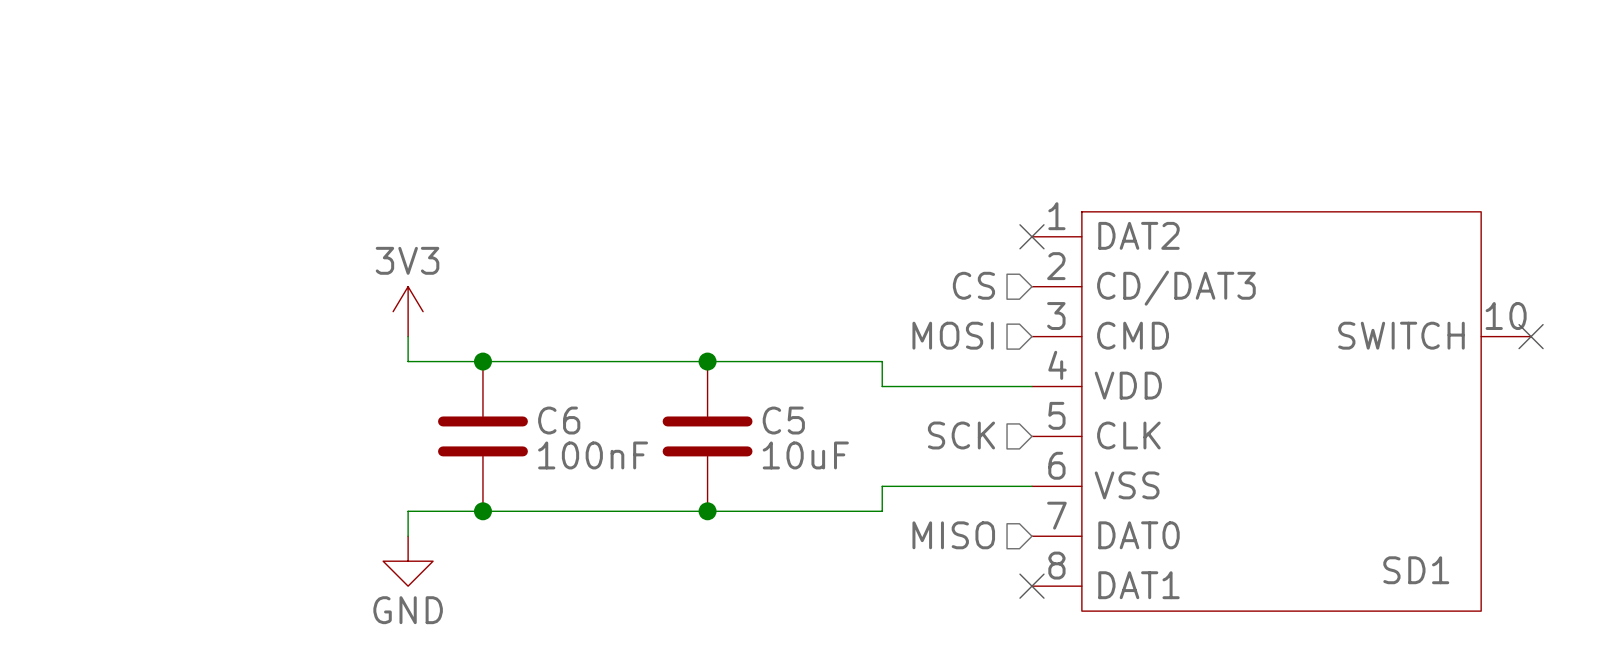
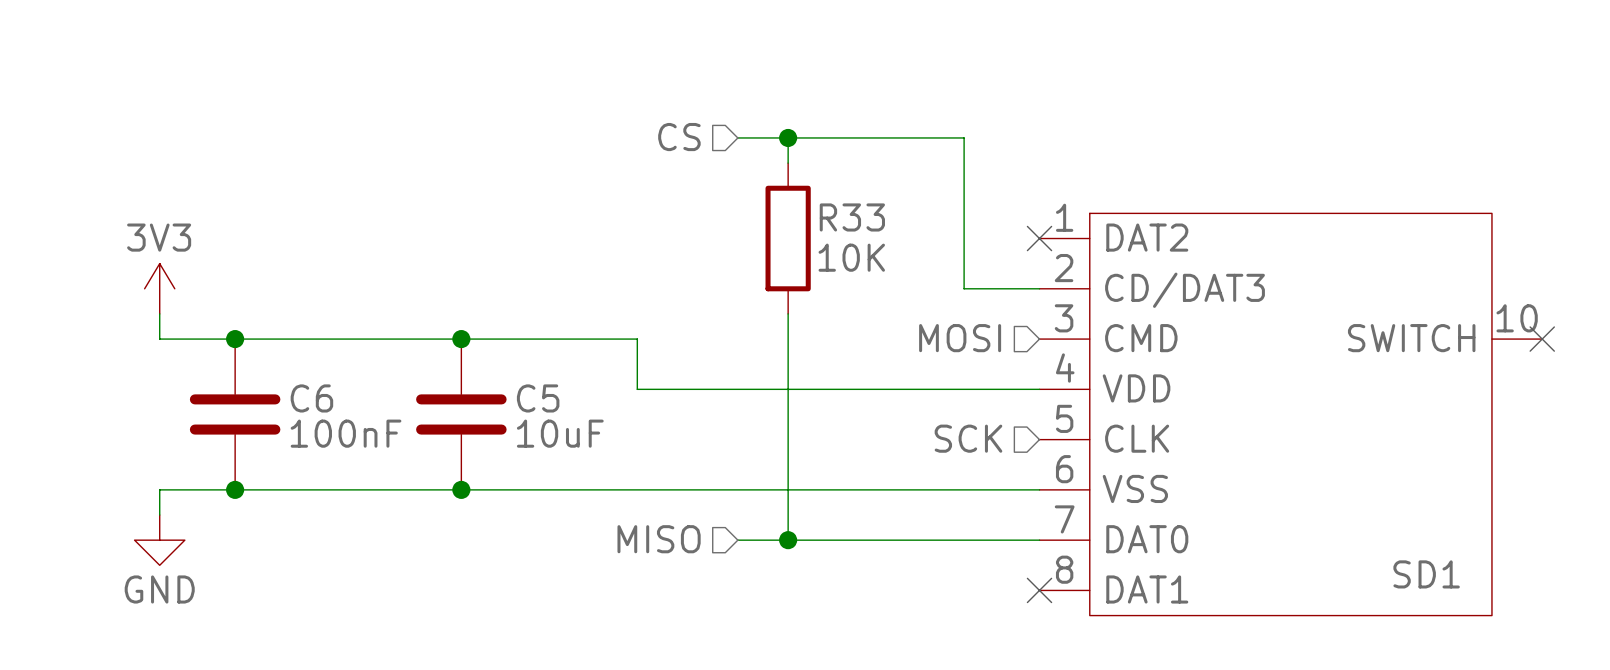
wire: none -> (737, 137) (964, 137) (964, 288) (1039, 288)
wire: none -> (788, 137) (788, 163)
junction: none -> (788, 137)
R33: none -> 10K (788, 238)
hierarchical label position: CS (973, 285) -> CS (679, 137)
power symbol position: 3V3 (408, 311) -> 3V3 (159, 288)
wire: none -> (788, 313) (788, 540)
junction: none -> (235, 339)
wire: (408, 336) (408, 361) (882, 361) (882, 386) -> (159, 313) (159, 339) (637, 339) (637, 389) (888, 389)
junction position: (482, 361) -> (461, 339)
junction: (707, 361) -> none
C6 position: (482, 436) -> (235, 414)
C5 position: (707, 436) -> (461, 414)
junction: none -> (235, 489)
wire: (882, 486) (882, 511) (408, 511) (408, 536) -> (888, 489) (159, 489) (159, 515)
junction position: (482, 511) -> (461, 489)
junction position: (707, 511) -> (788, 540)
hierarchical label position: MISO (953, 535) -> MISO (659, 539)
wire: none -> (737, 540) (1039, 540)
power symbol position: GND (408, 561) -> GND (159, 540)

